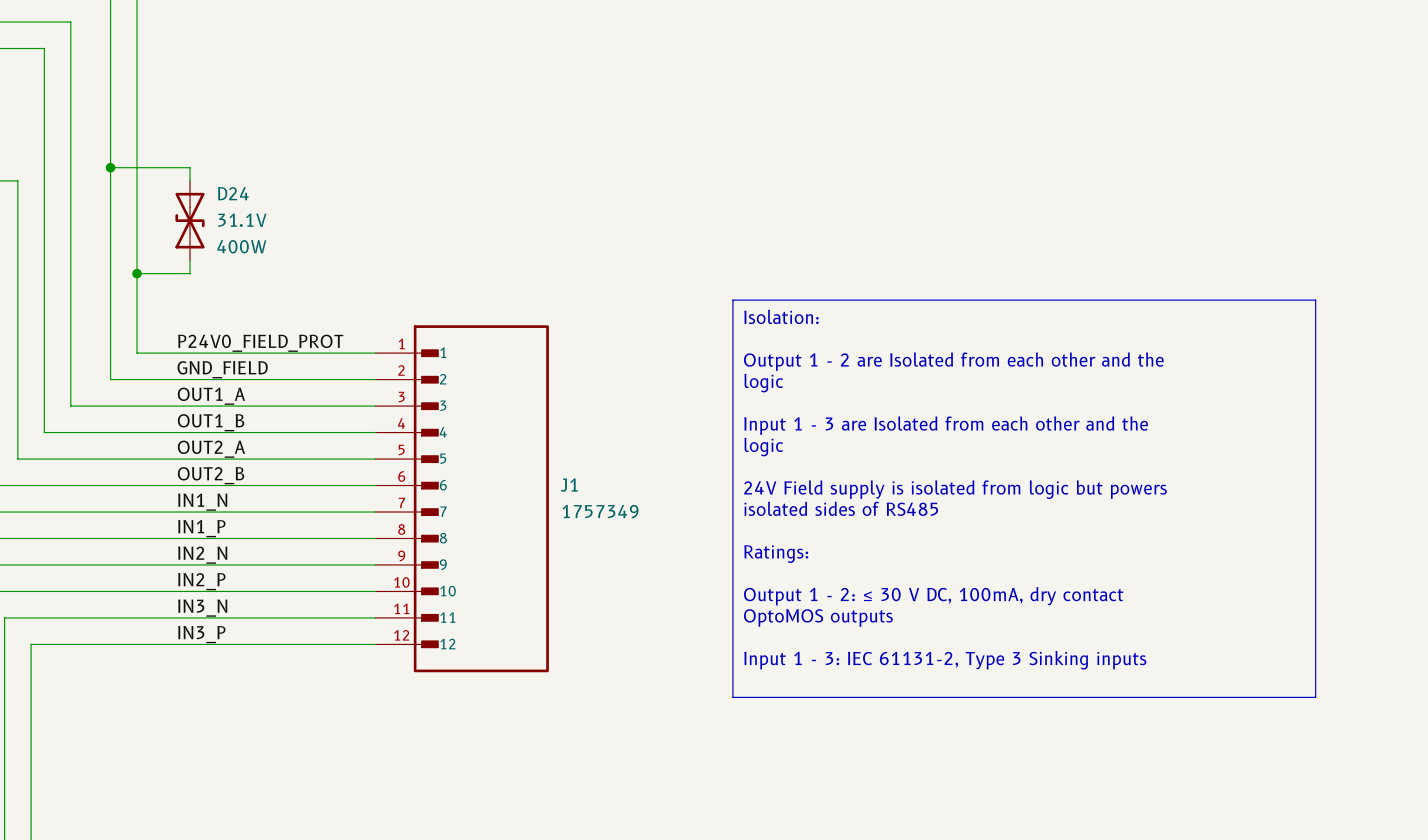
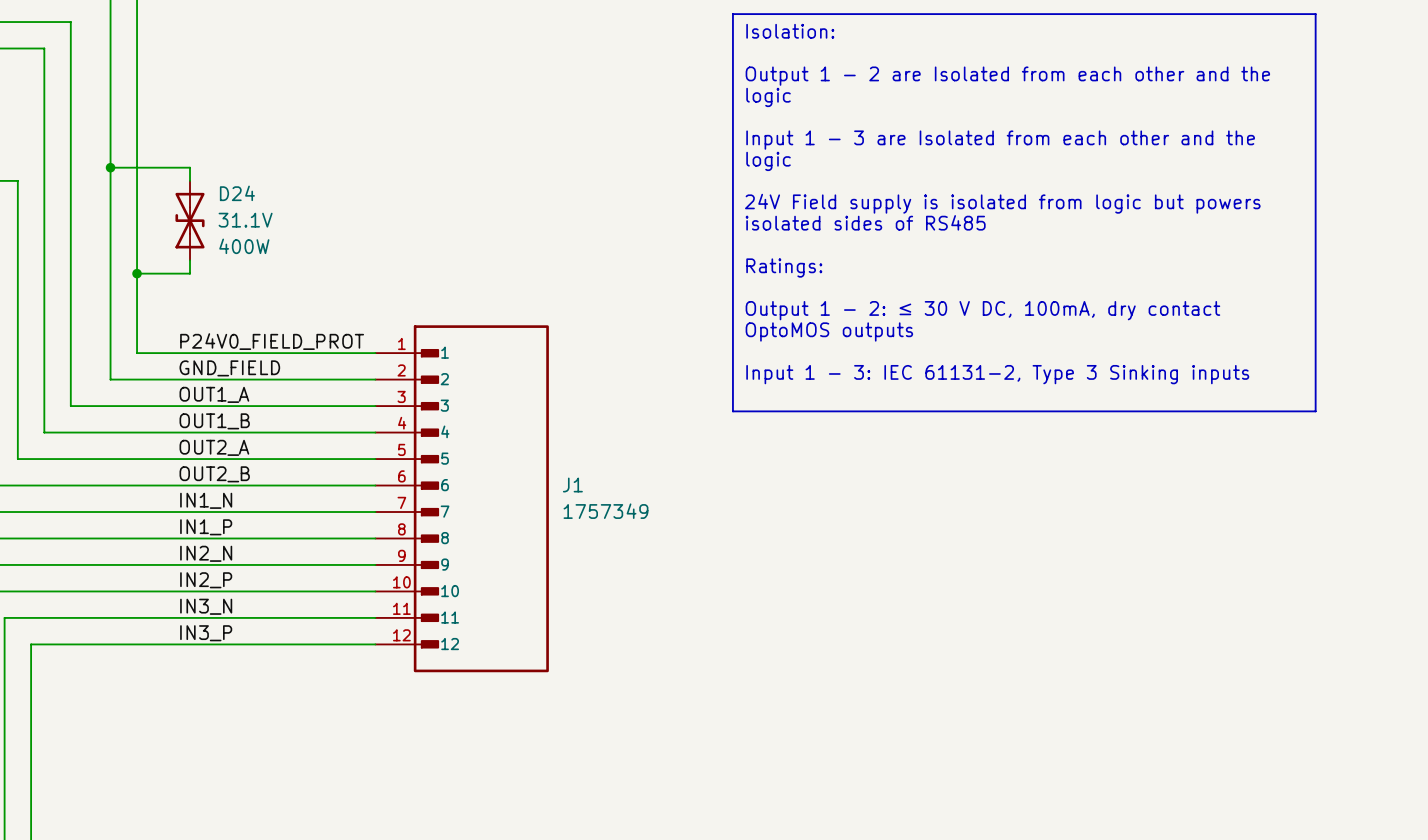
text: none -> Isolation: (790, 31)
text: none -> Output 1 - 2 are Isolated from each other and the (1007, 76)
text: none -> logic (768, 97)
text: none -> Input 1 - 3 are Isolated from each other and the (1000, 140)
text: none -> logic (768, 161)
text: none -> 24V Field supply is isolated from logic but powers (1002, 203)
text: none -> isolated sides of RS485 (865, 222)
text: none -> Ratings: (784, 268)
line: (732, 300) (1315, 300) -> (732, 300) (732, 14) (1315, 14) (1315, 300)
text: none -> Output 1 - 2: ≤ 30 V DC, 100mA, dry contact (982, 310)
text: Isolation: (781, 316) -> none
text: none -> OptoMOS outputs (829, 331)
text: Output 1 - 2 are Isolated from each other and the (953, 361) -> none
text: none -> Input 1 - 3: IEC 61131-2, Type 3 Sinking inputs (997, 374)
text: logic (763, 383) -> none
line: (732, 411) (732, 697) (1315, 697) (1315, 411) -> (732, 411) (1315, 411)
text: Input 1 - 3 are Isolated from each other and the (946, 425) -> none
text: logic (763, 447) -> none
text: 24V Field supply is isolated from logic but powers (955, 489) -> none
text: isolated sides of RS485 (841, 508) -> none
text: Ratings: (776, 554) -> none
text: Output 1 - 2: ≤ 30 V DC, 100mA, dry contact (933, 596) -> none
text: OptoMOS outputs (818, 617) -> none
text: Input 1 - 3: IEC 61131-2, Type 3 Sinking inputs (945, 660) -> none

